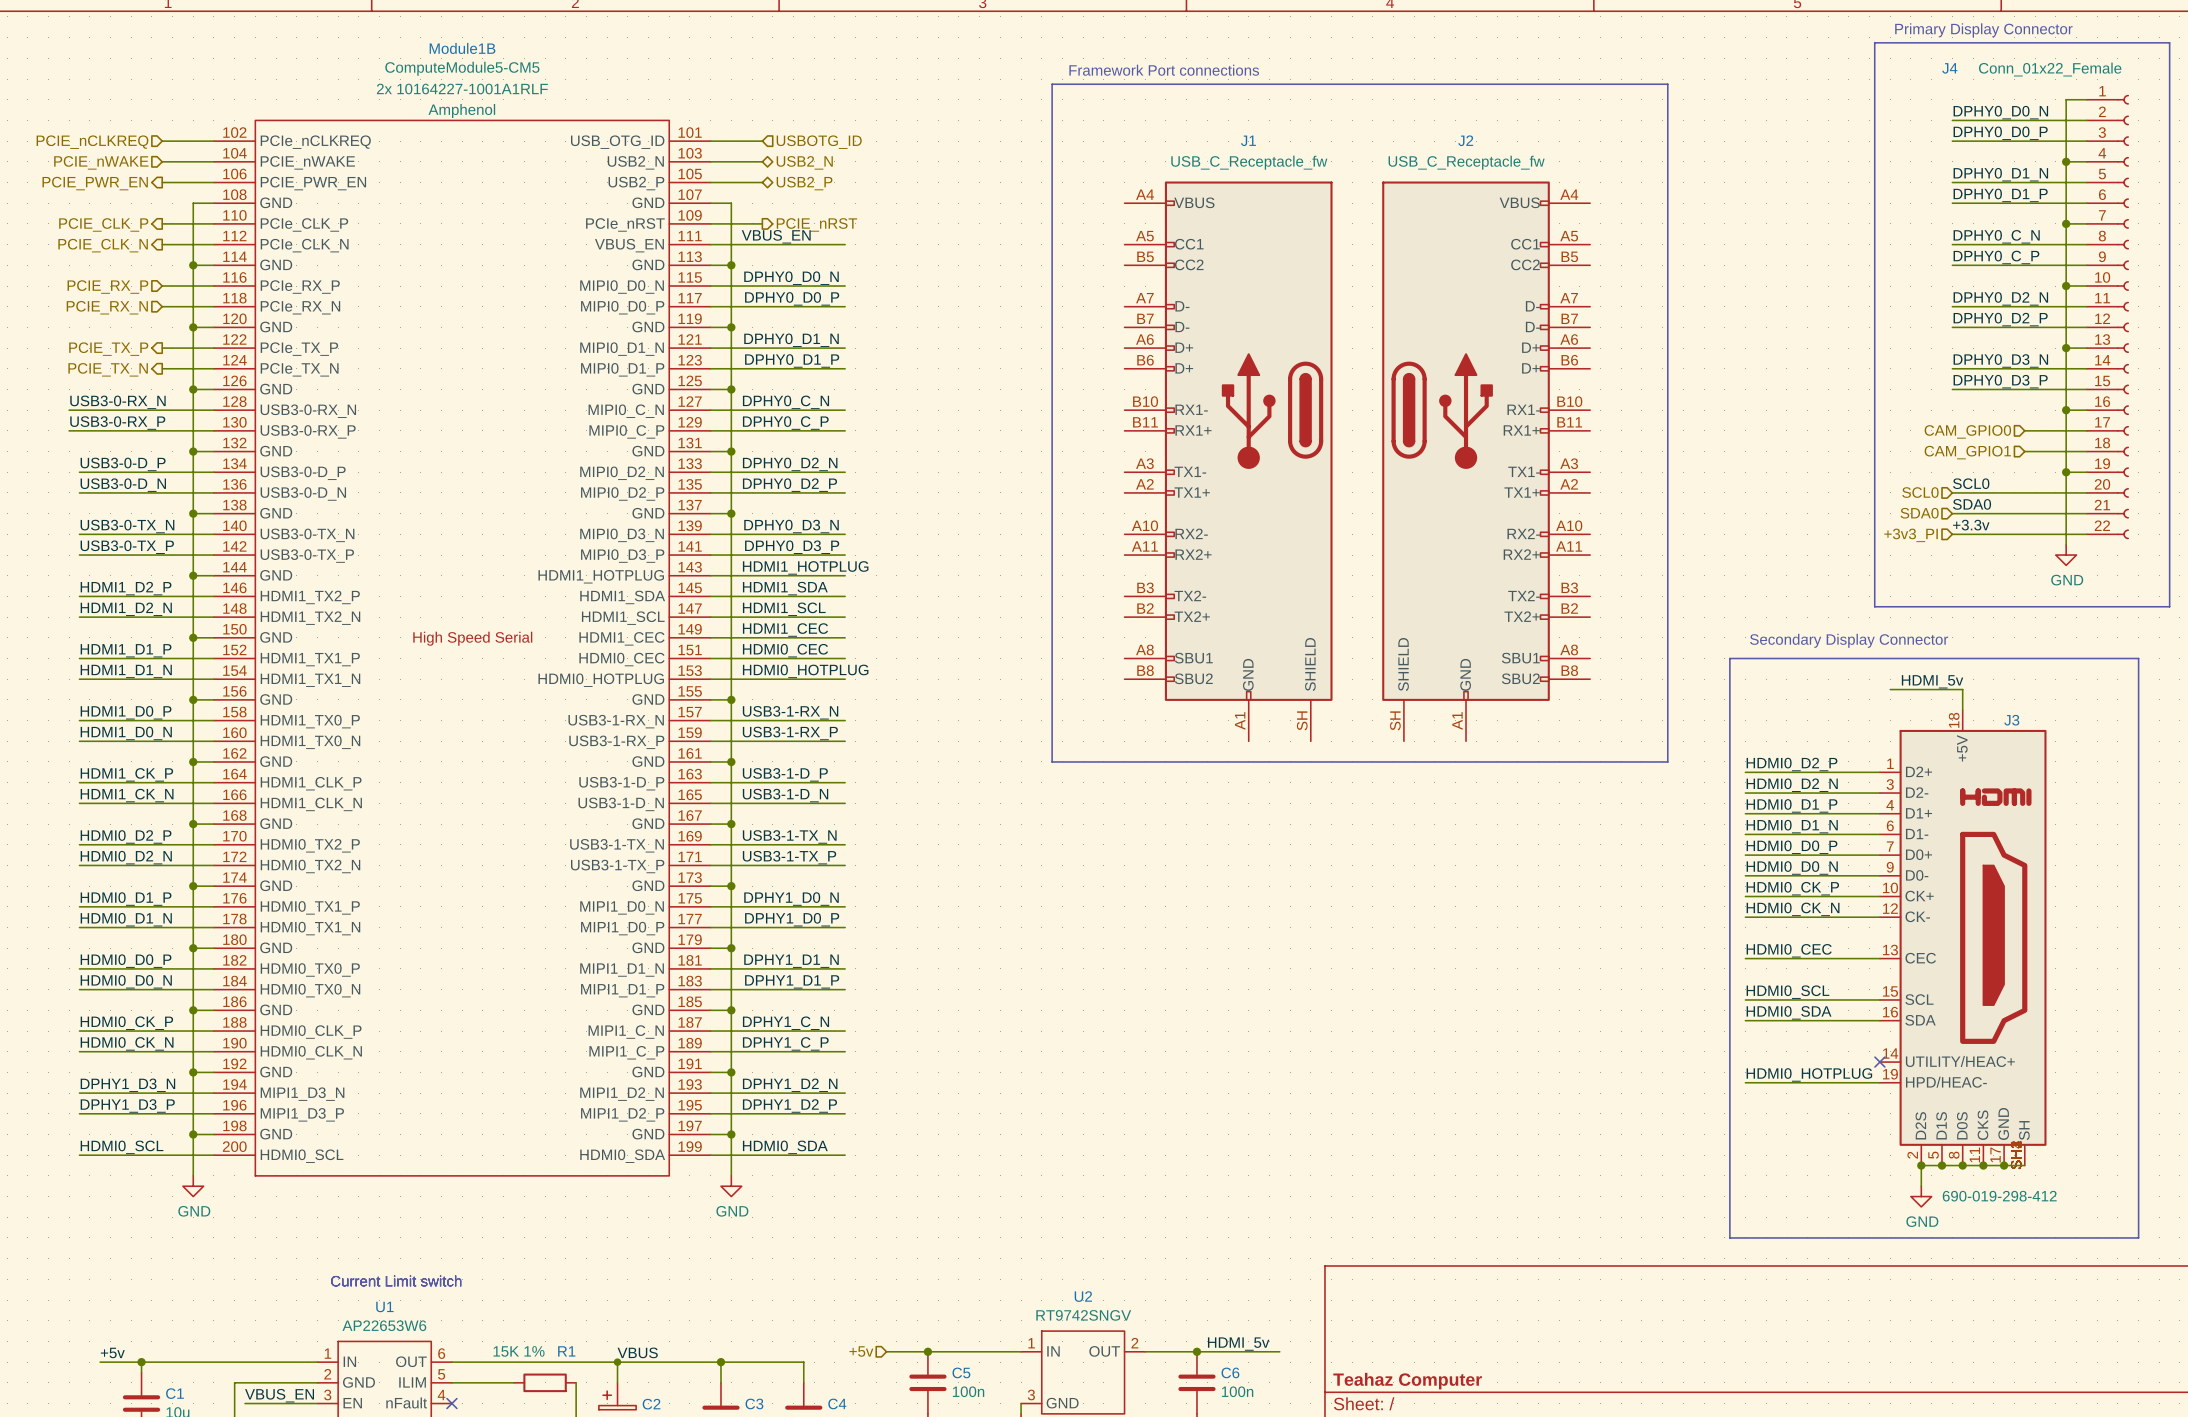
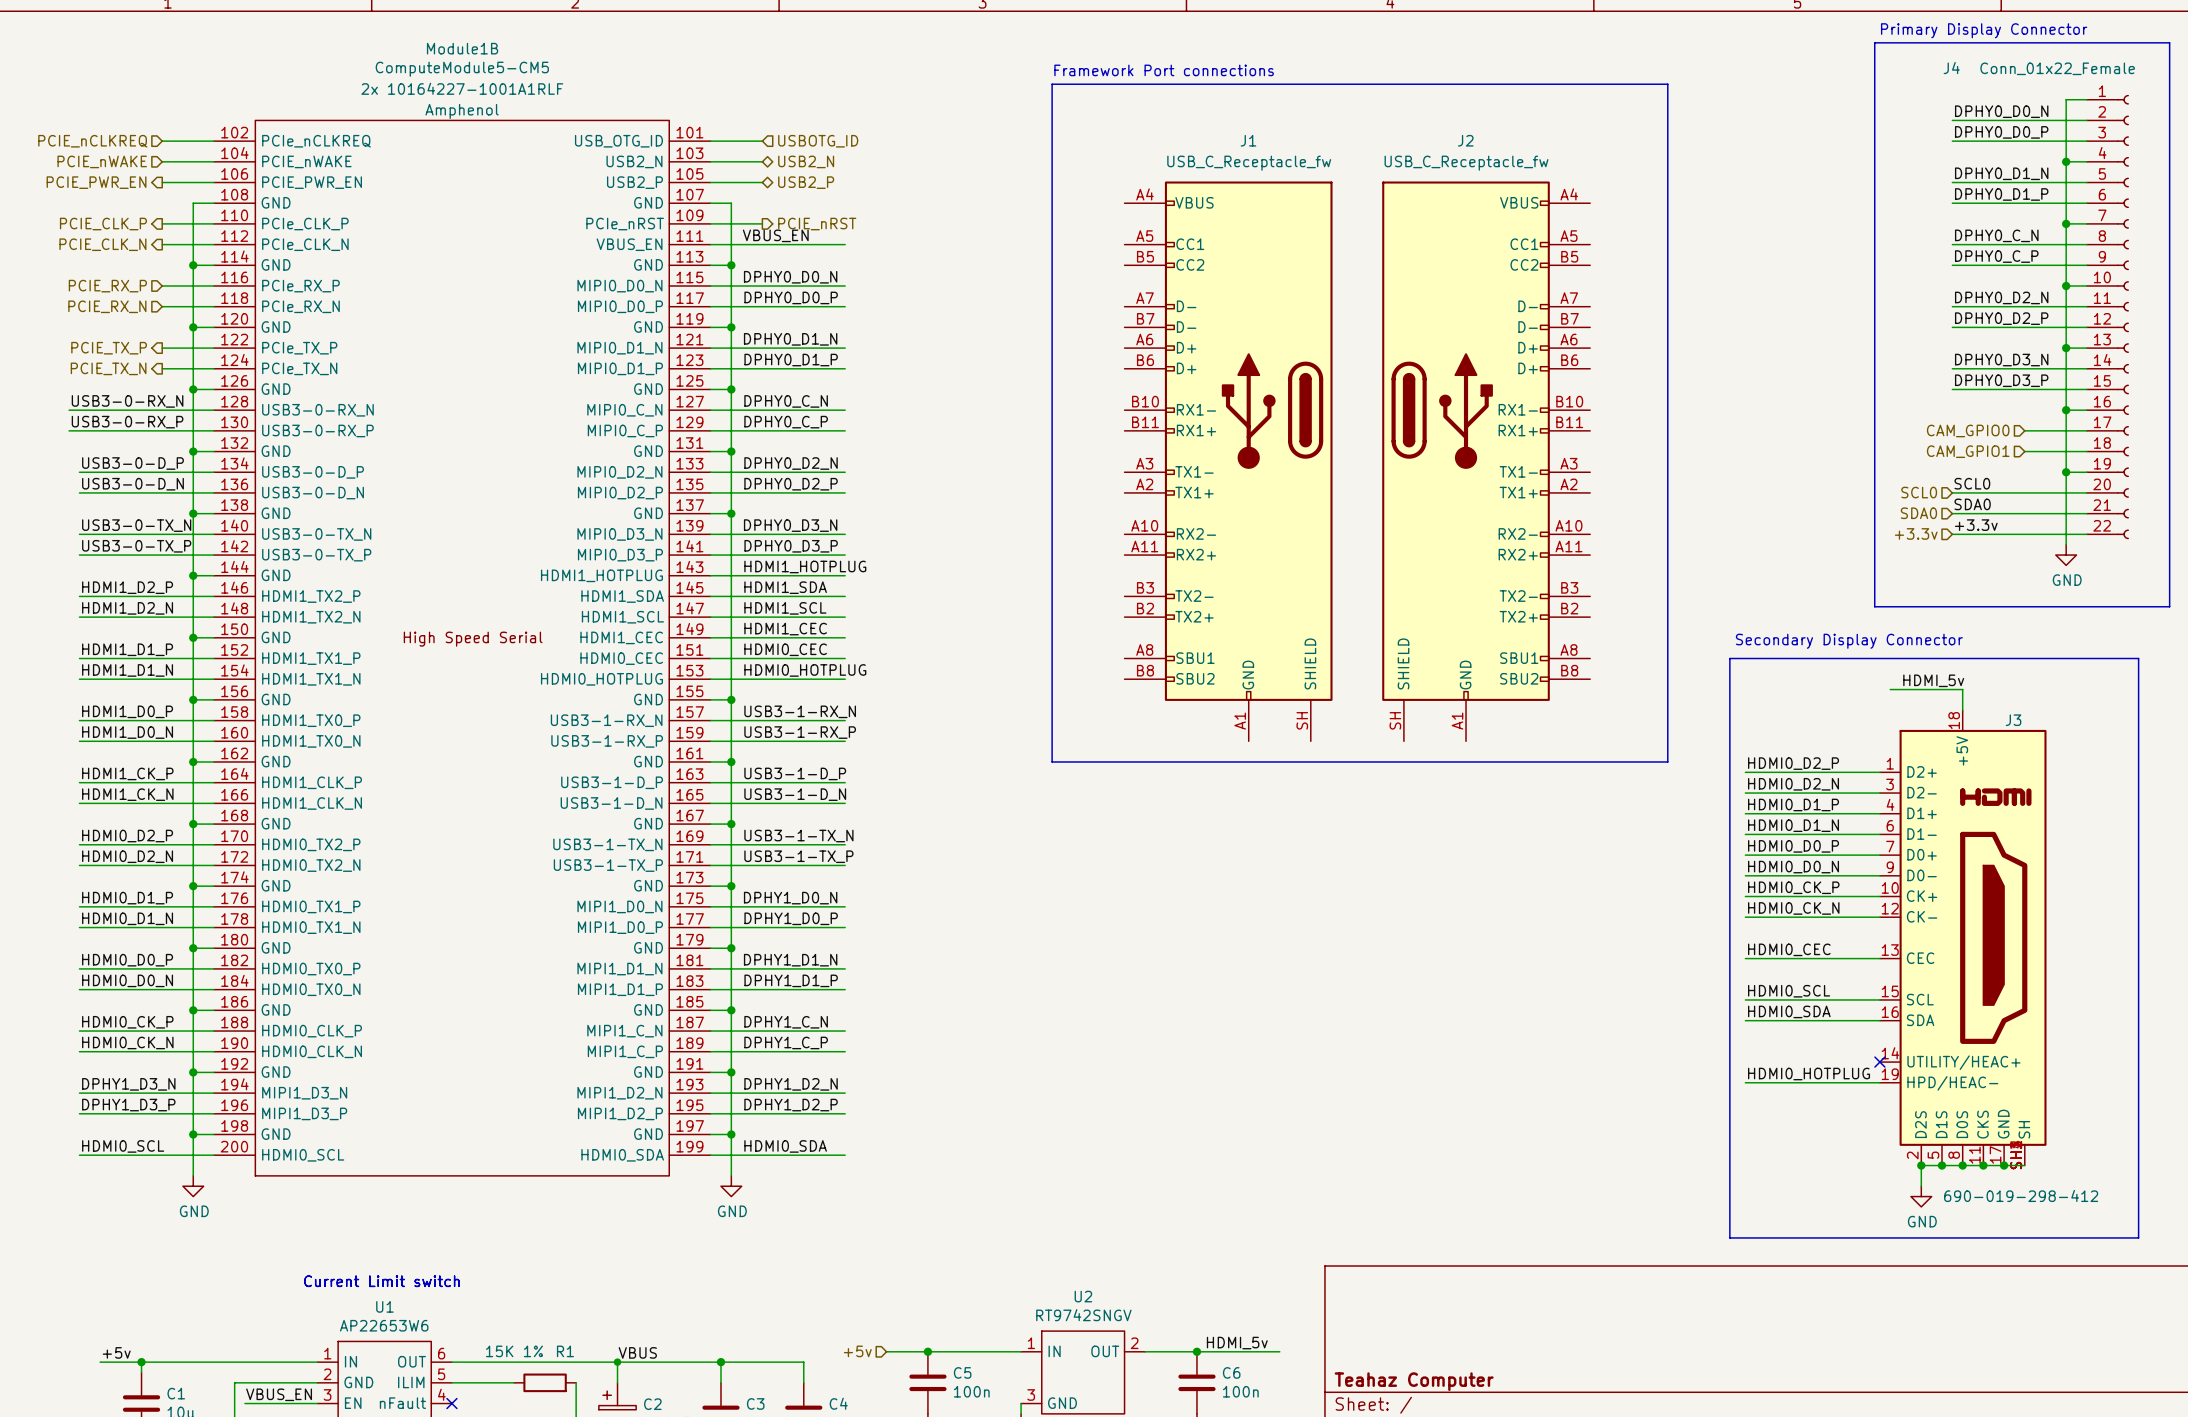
hierarchical label: +3v3_PI (1911, 535) -> +3.3v (1916, 533)

